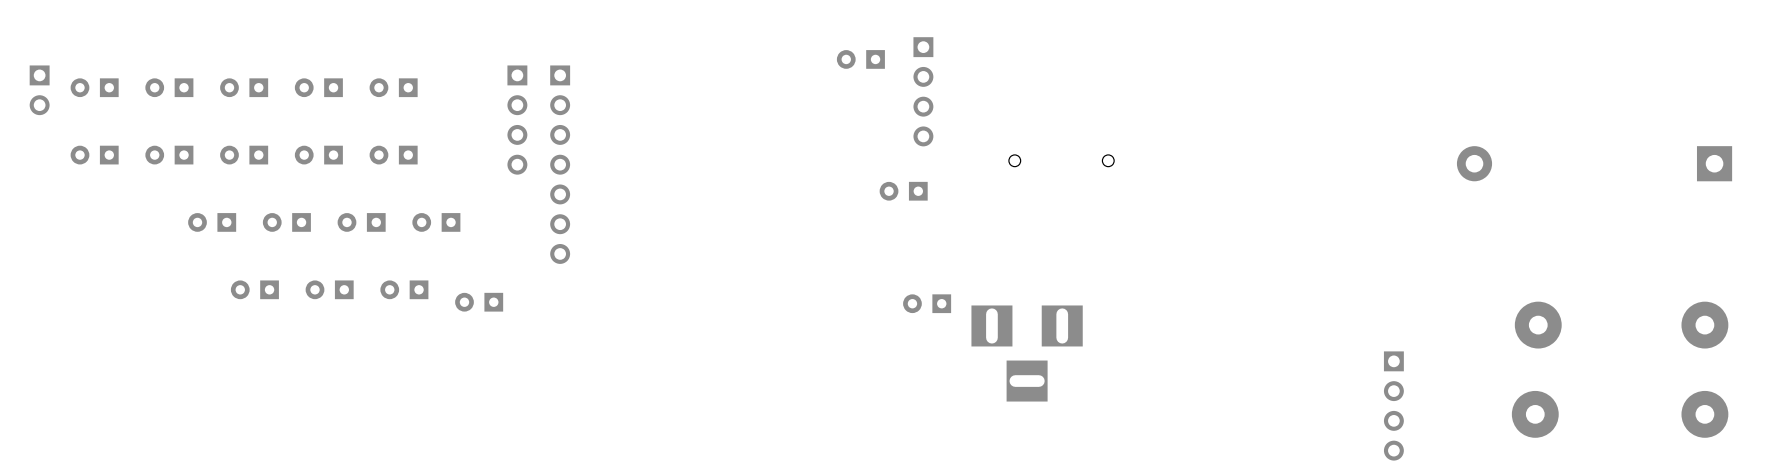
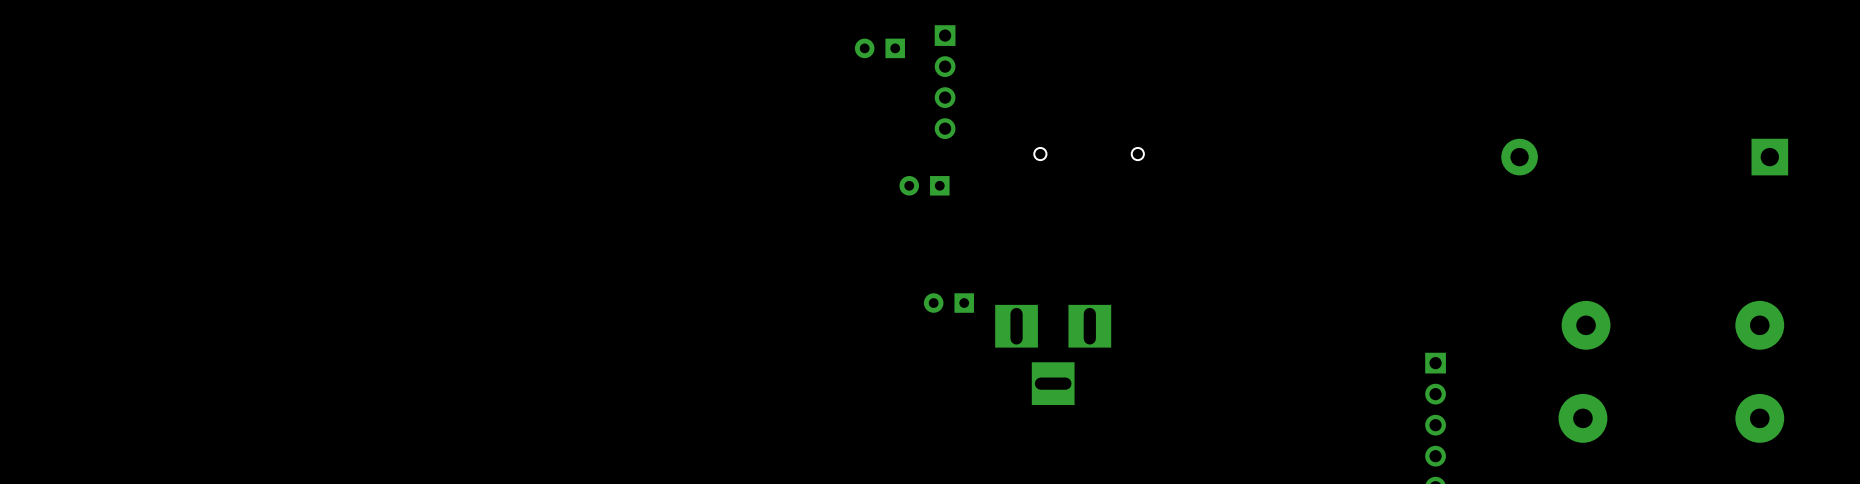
part: (94, 87) -> none
part: (169, 87) -> none
part: (244, 87) -> none
part: (318, 87) -> none
part: (393, 87) -> none
part: (39, 90) -> none
part: (517, 120) -> none
part: (94, 155) -> none
part: (169, 155) -> none
part: (244, 155) -> none
part: (318, 155) -> none
part: (393, 155) -> none
part: (560, 164) -> none
part: (212, 222) -> none
part: (286, 222) -> none
part: (361, 222) -> none
part: (436, 222) -> none
part: (254, 289) -> none
part: (329, 289) -> none
part: (404, 289) -> none
part: (479, 302) -> none

